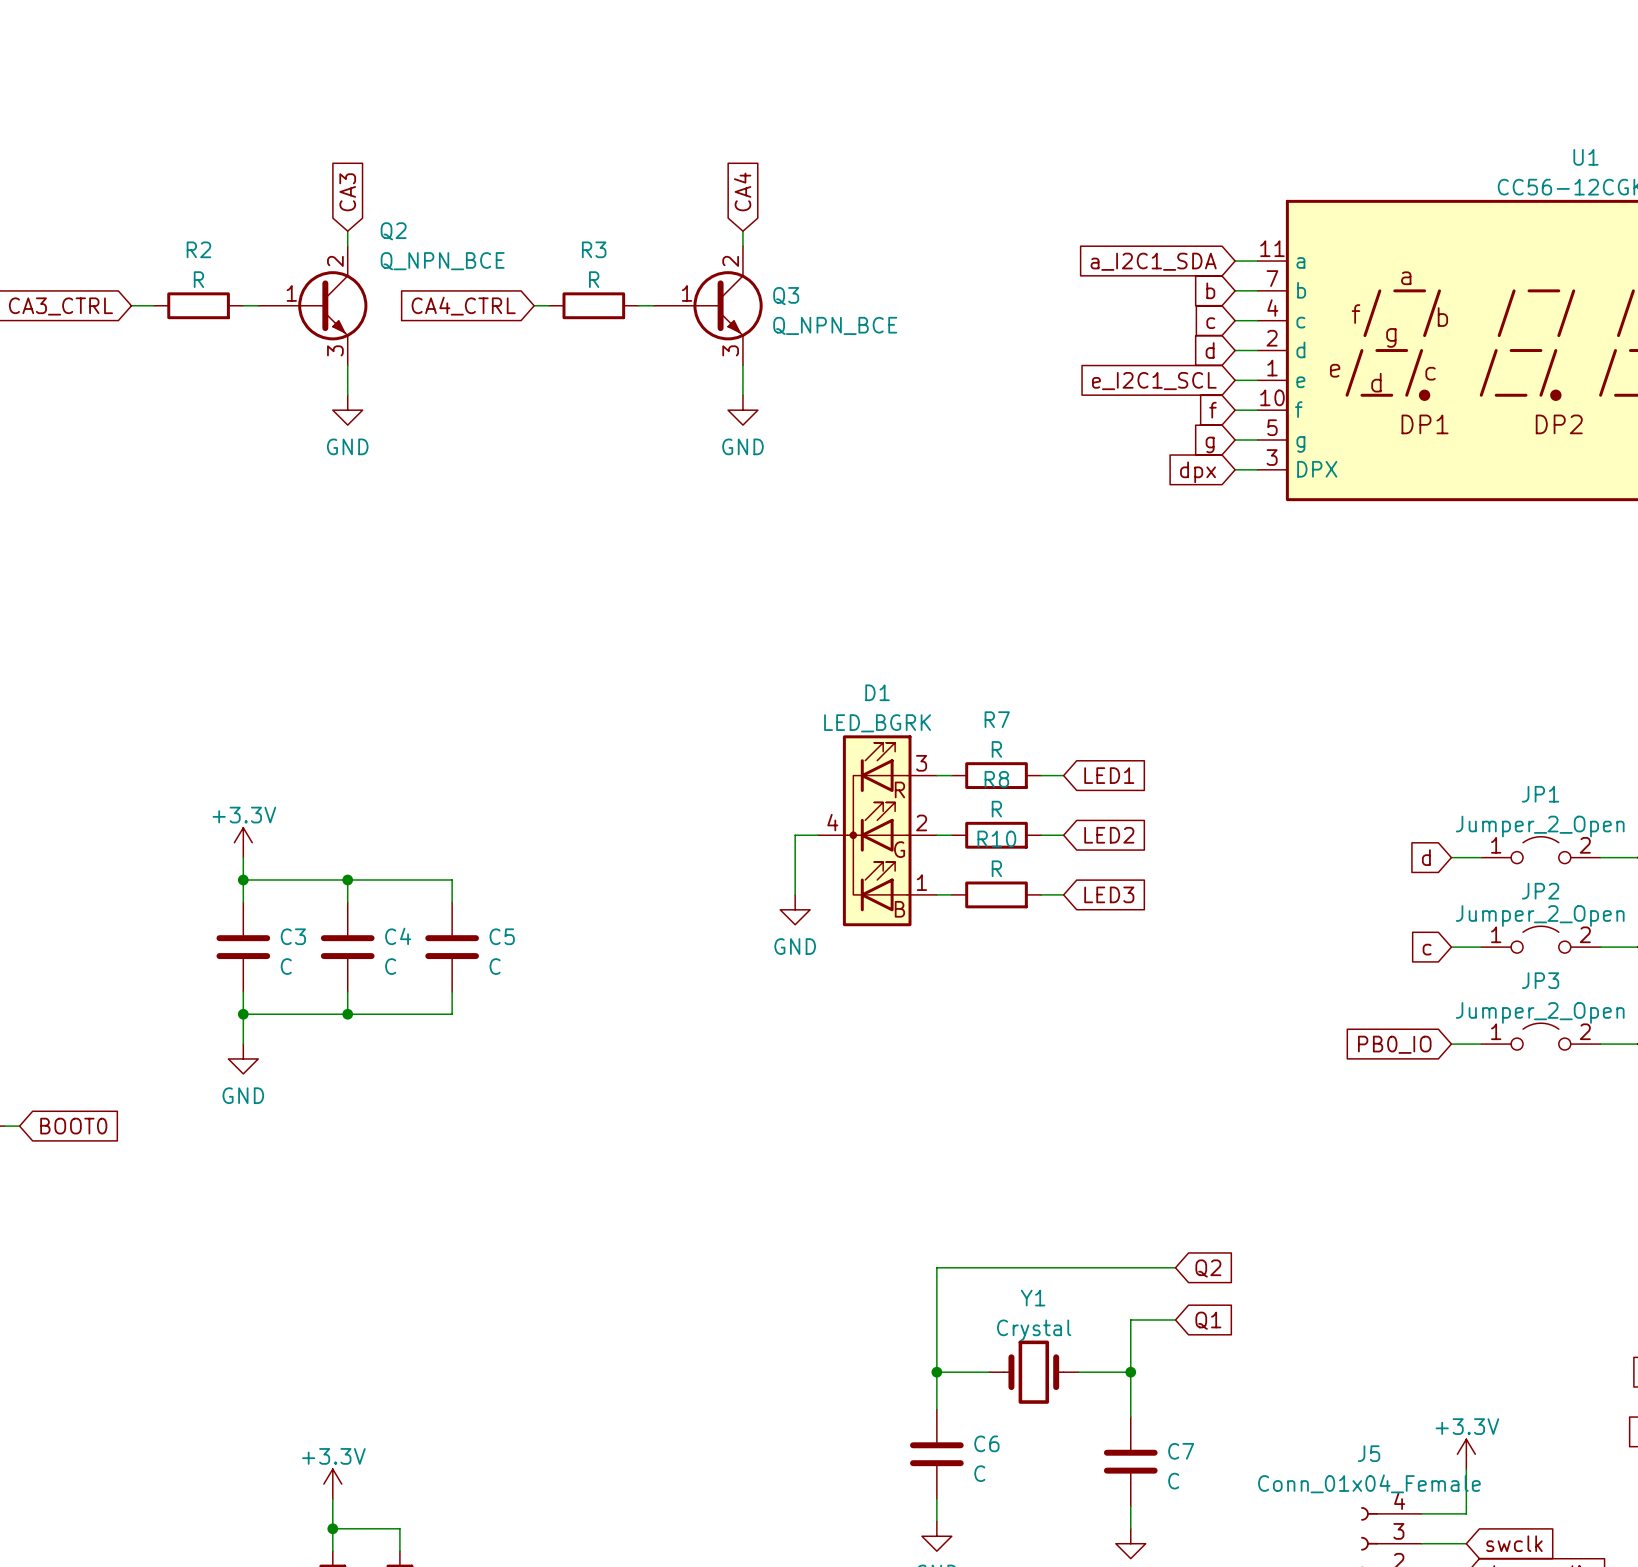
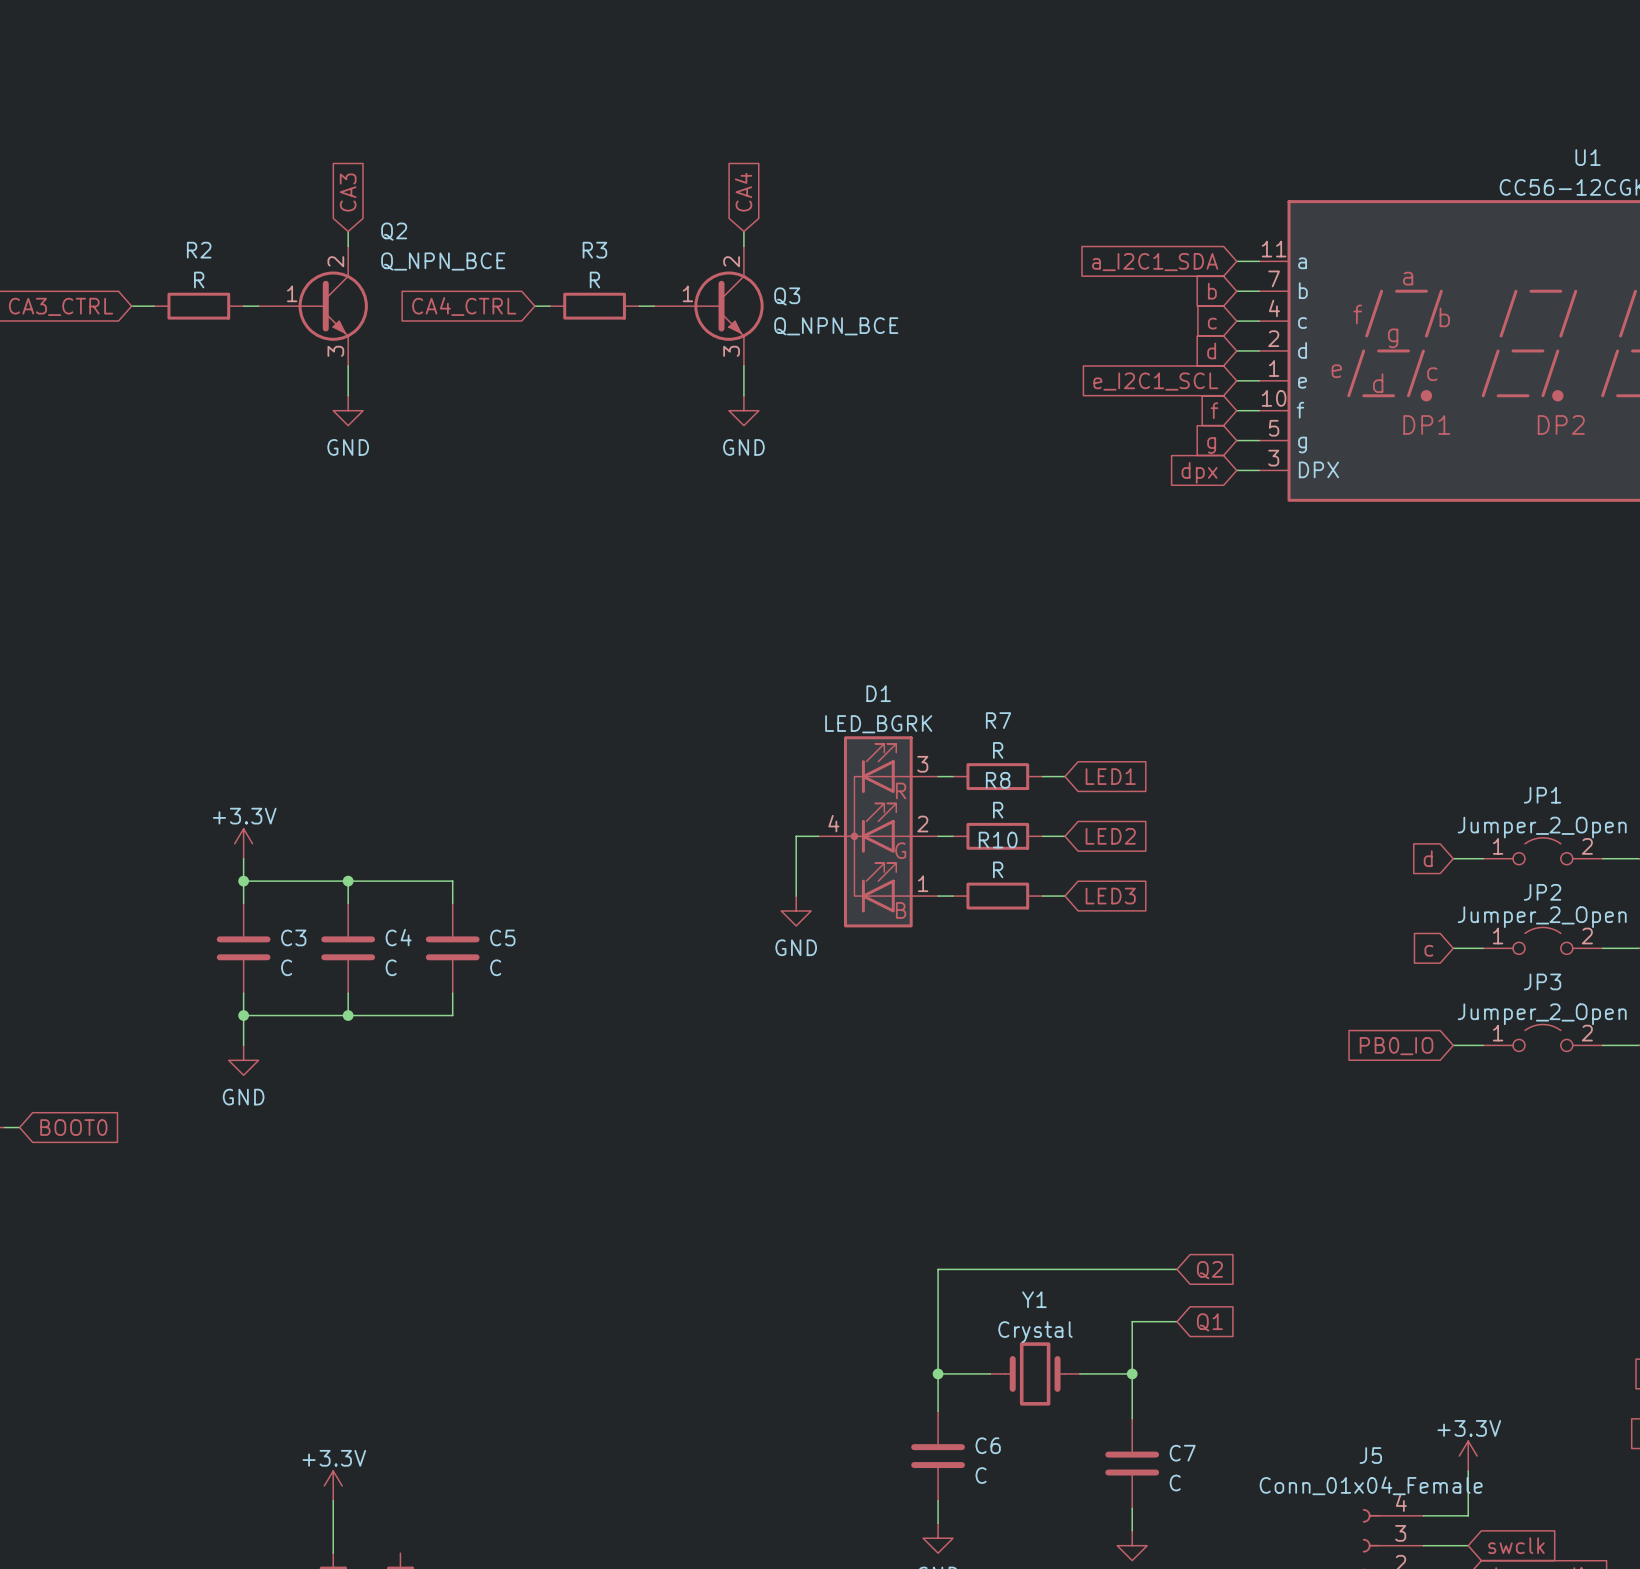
wire: (332, 1528) (399, 1528) (399, 1551) -> none
junction: (332, 1528) -> none

